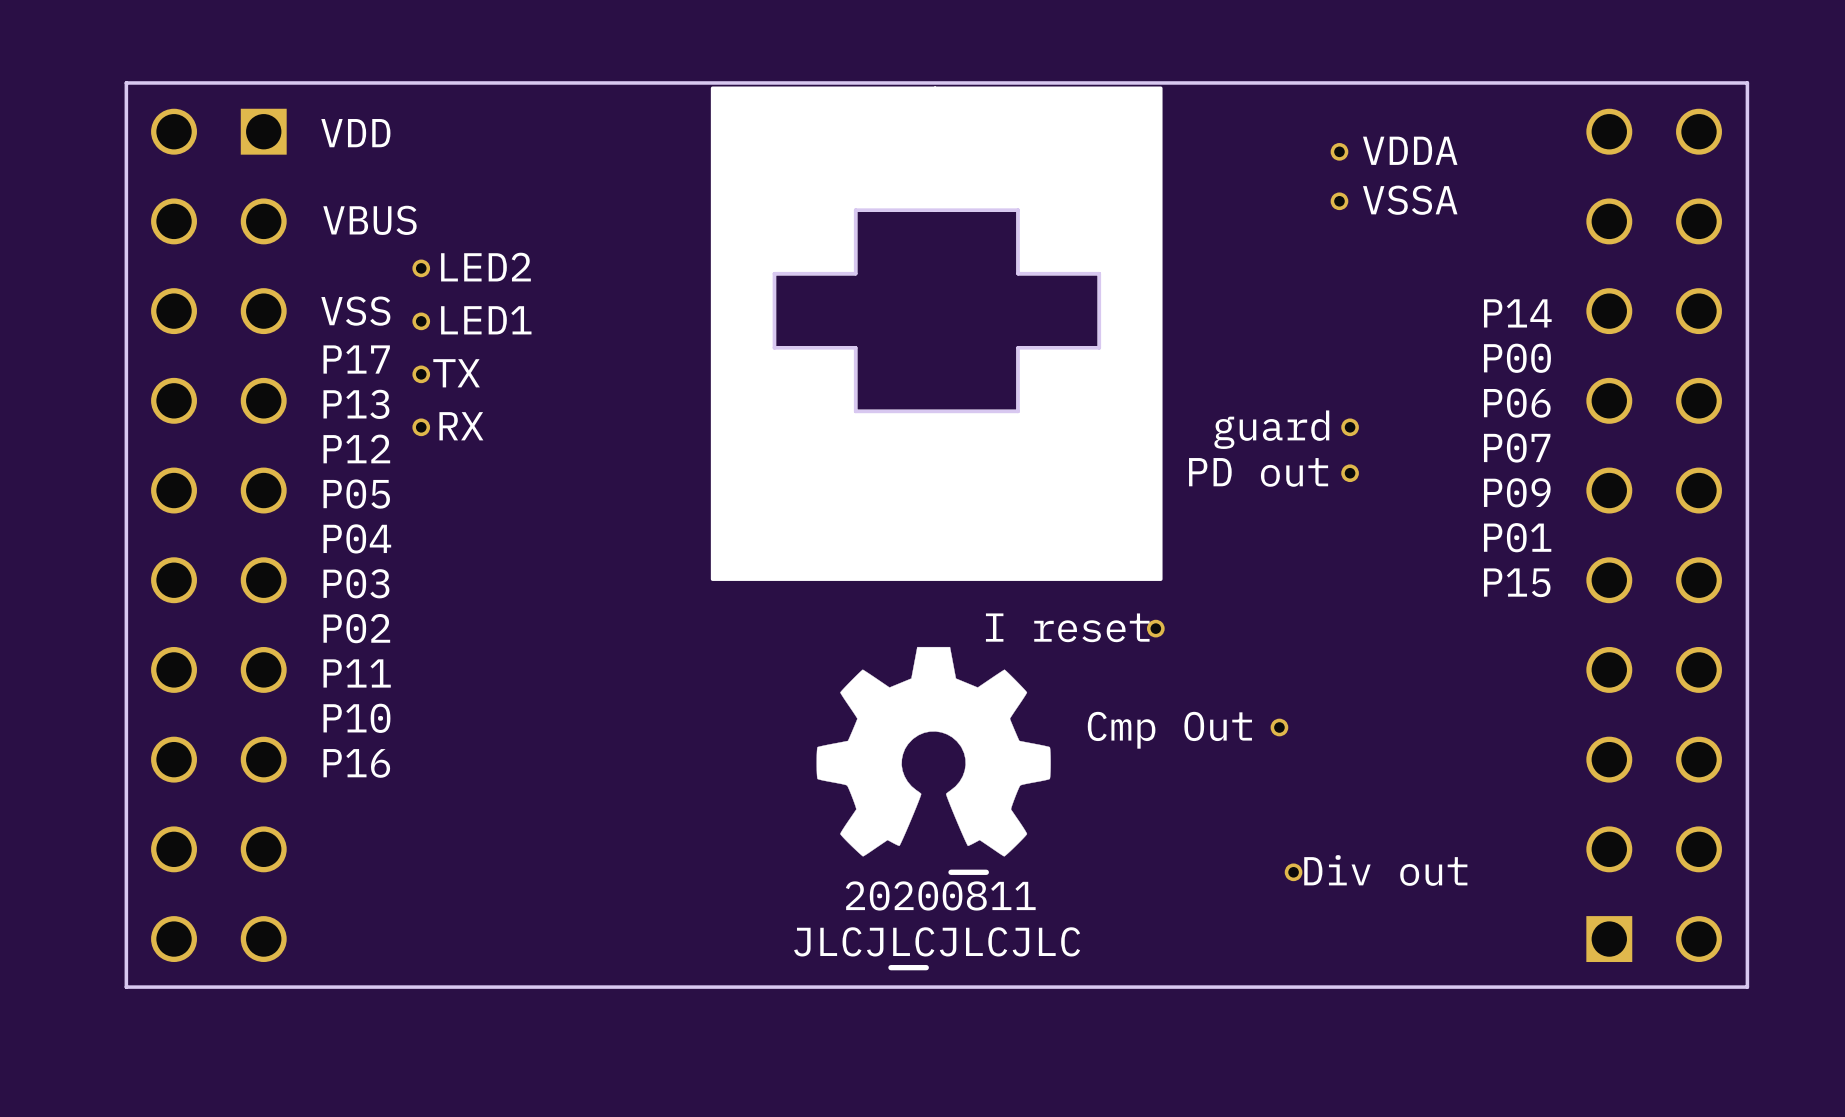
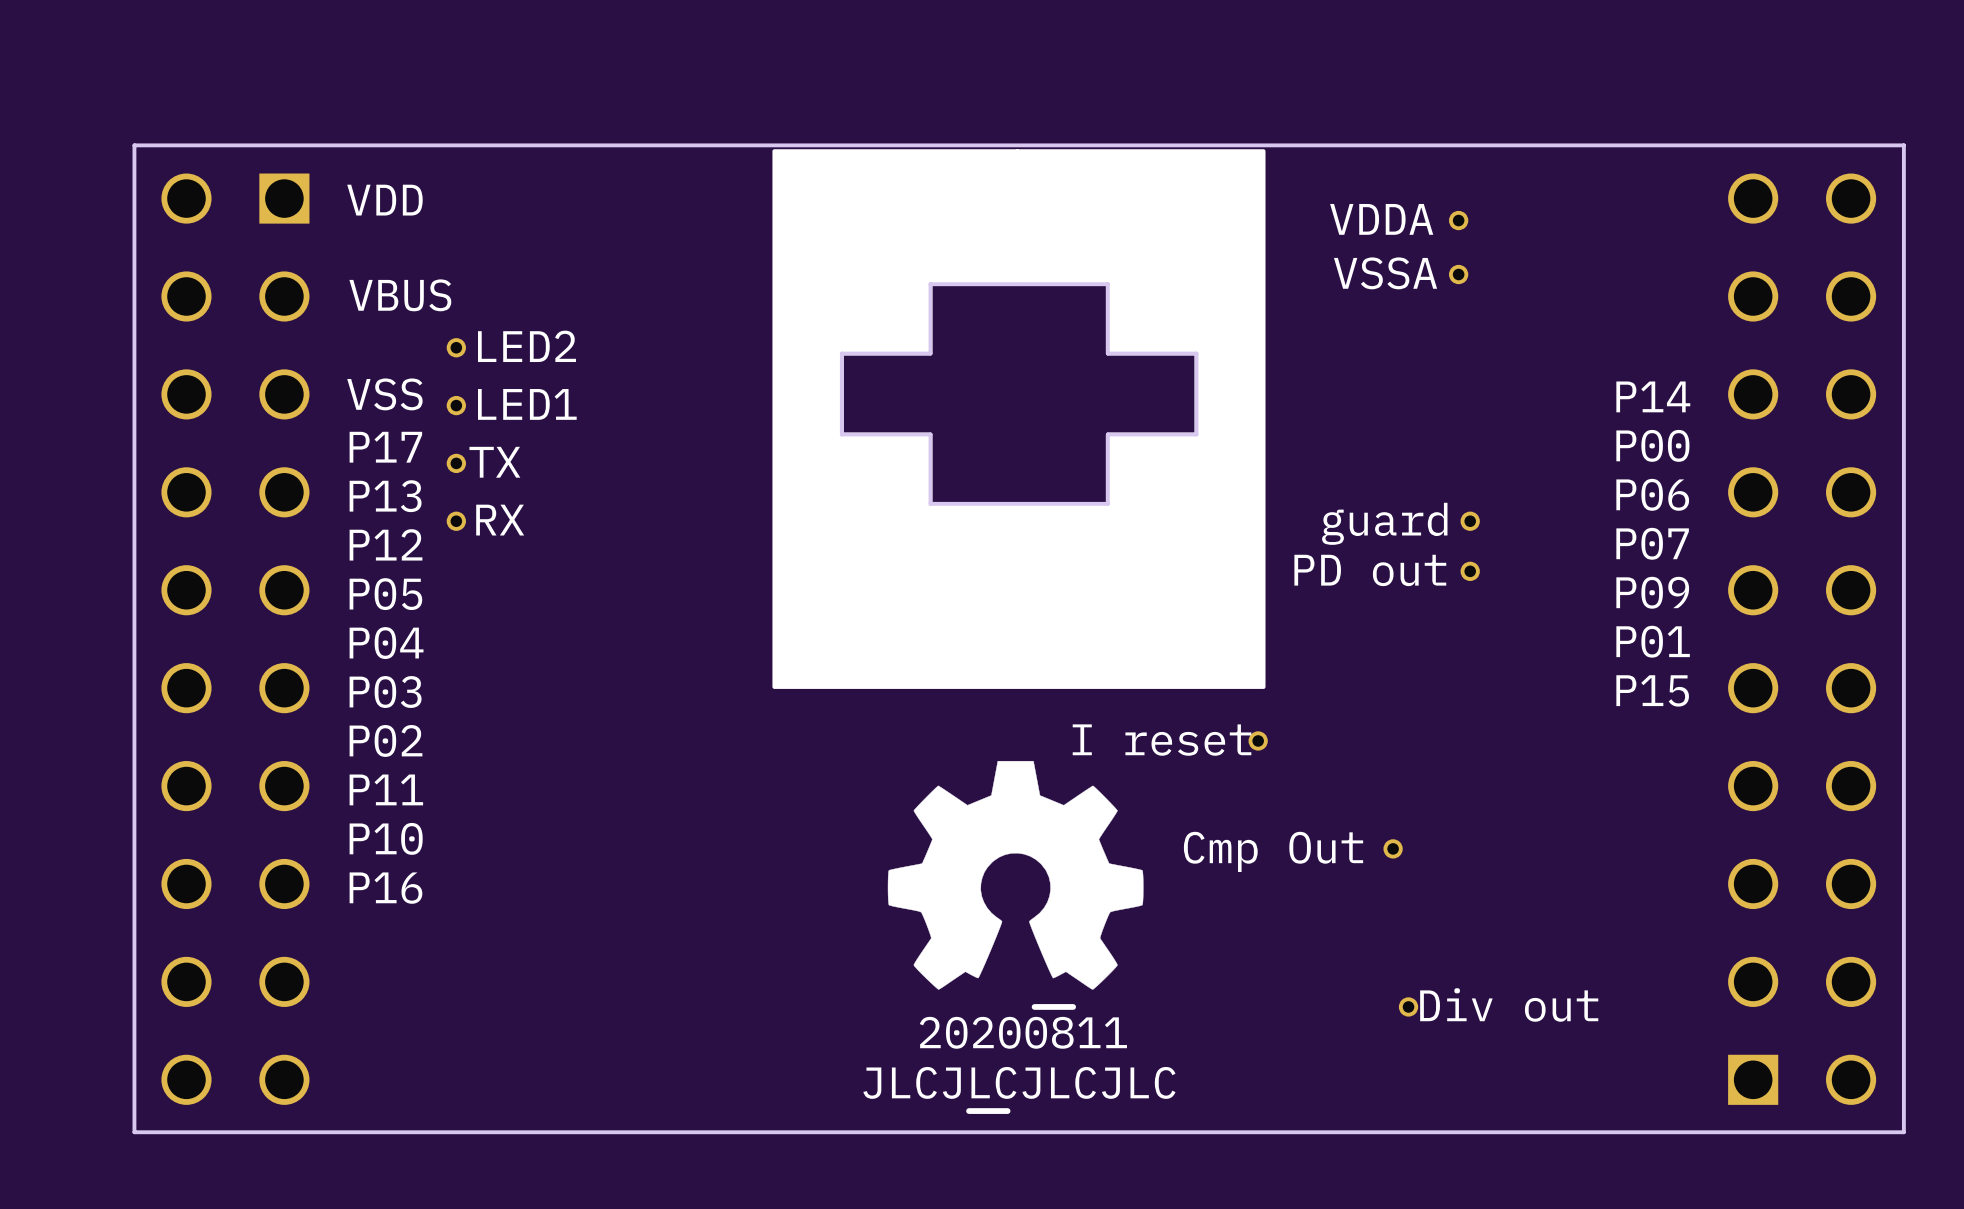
part value position: VDDA (1410, 150) -> VDDA (1381, 219)
part value position: VSSA (1410, 200) -> VSSA (1385, 273)

